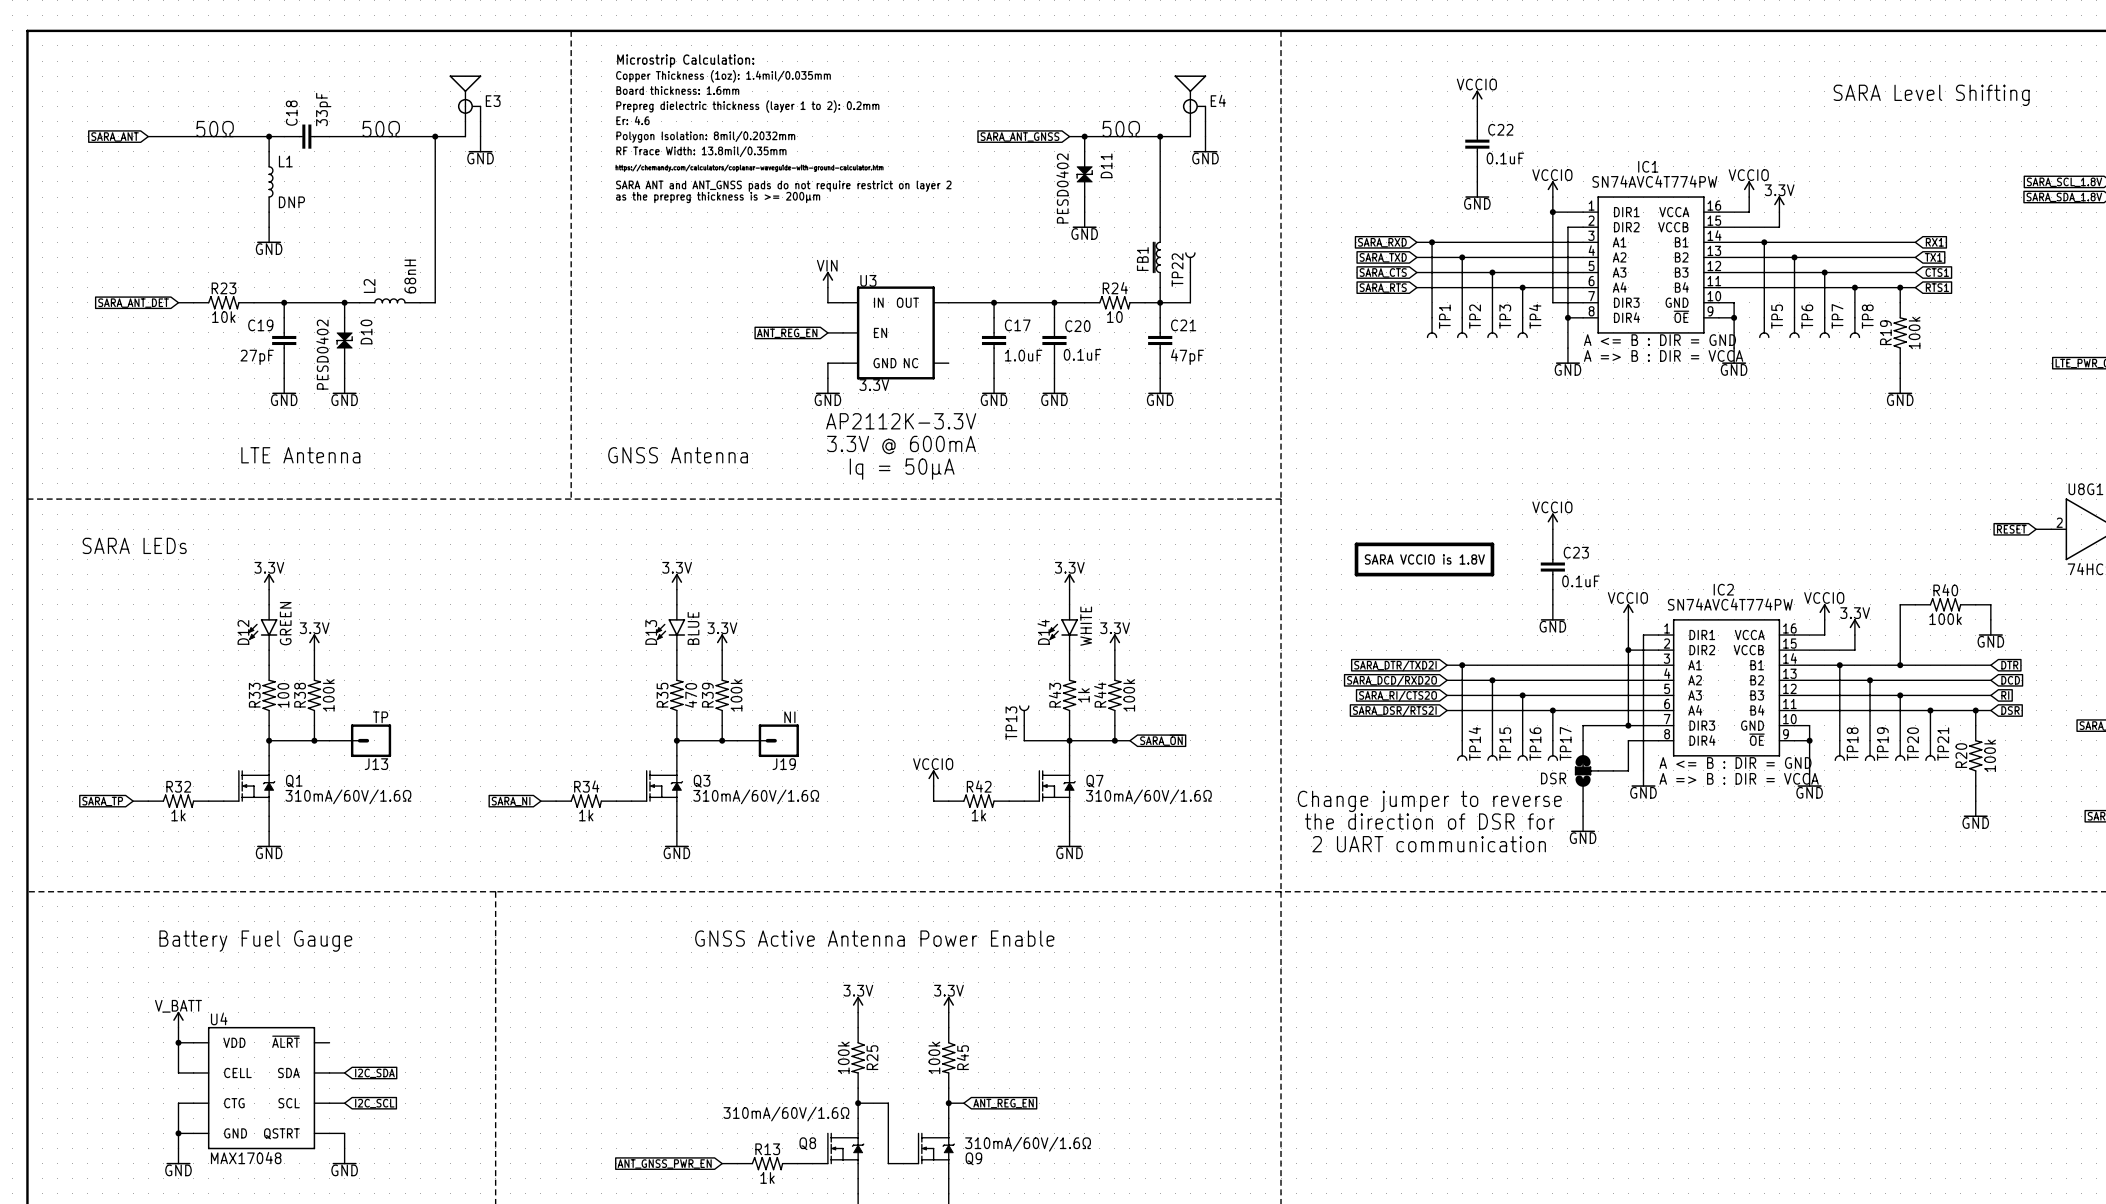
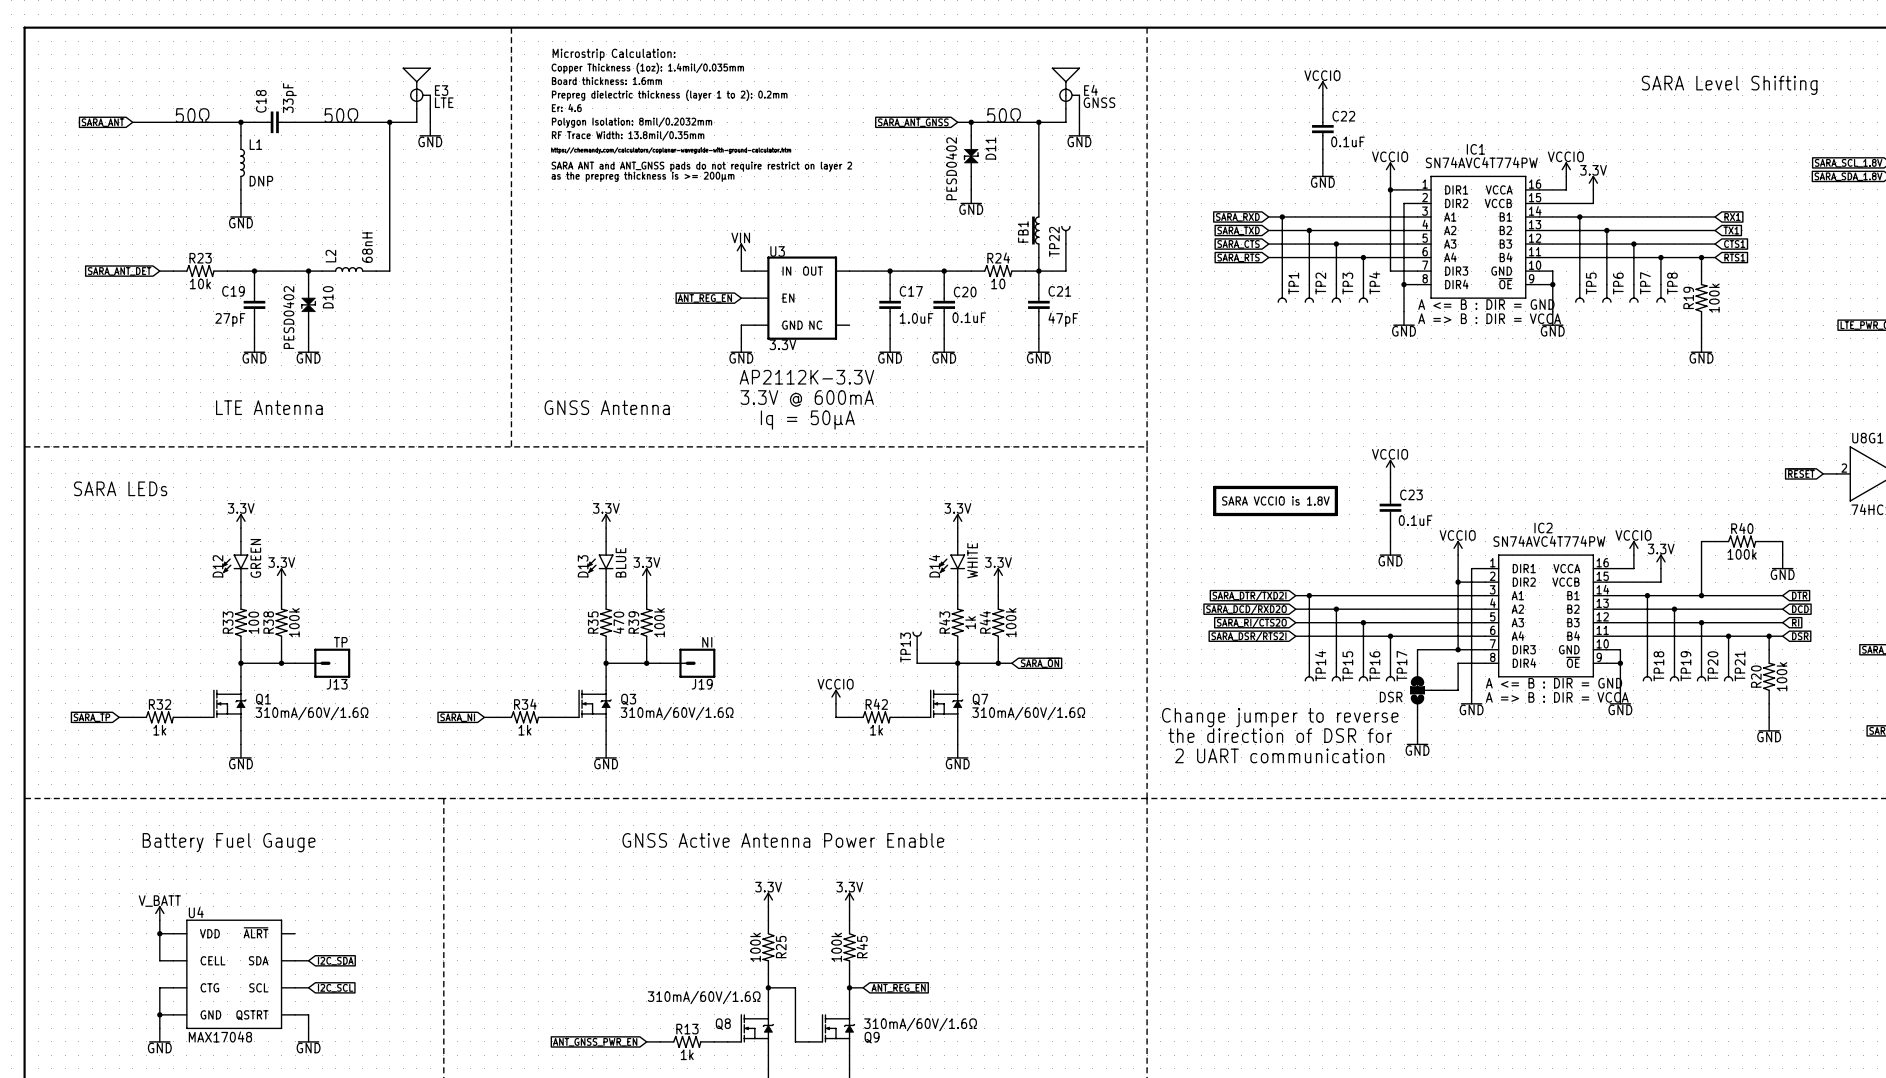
E3 value: none -> LTE (444, 102)
E4 value: none -> GNSS (1099, 102)

